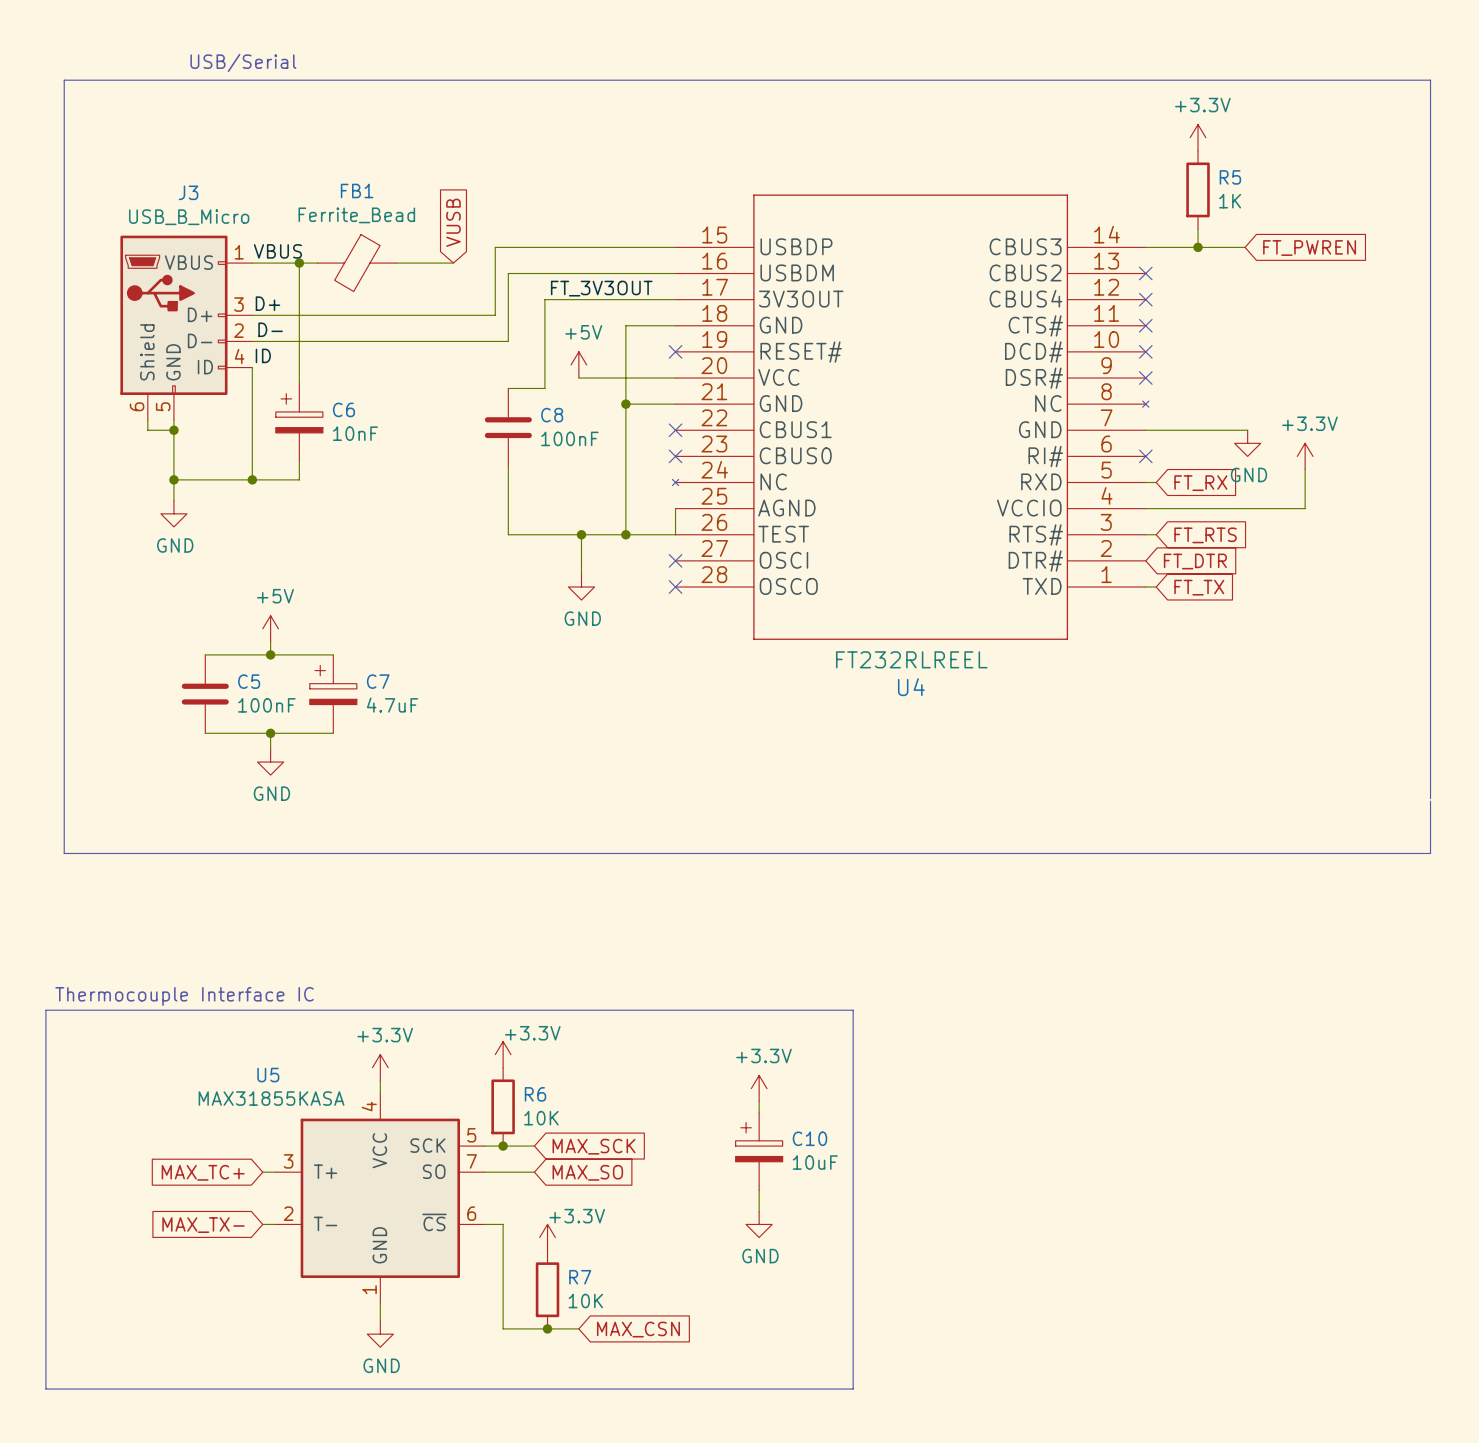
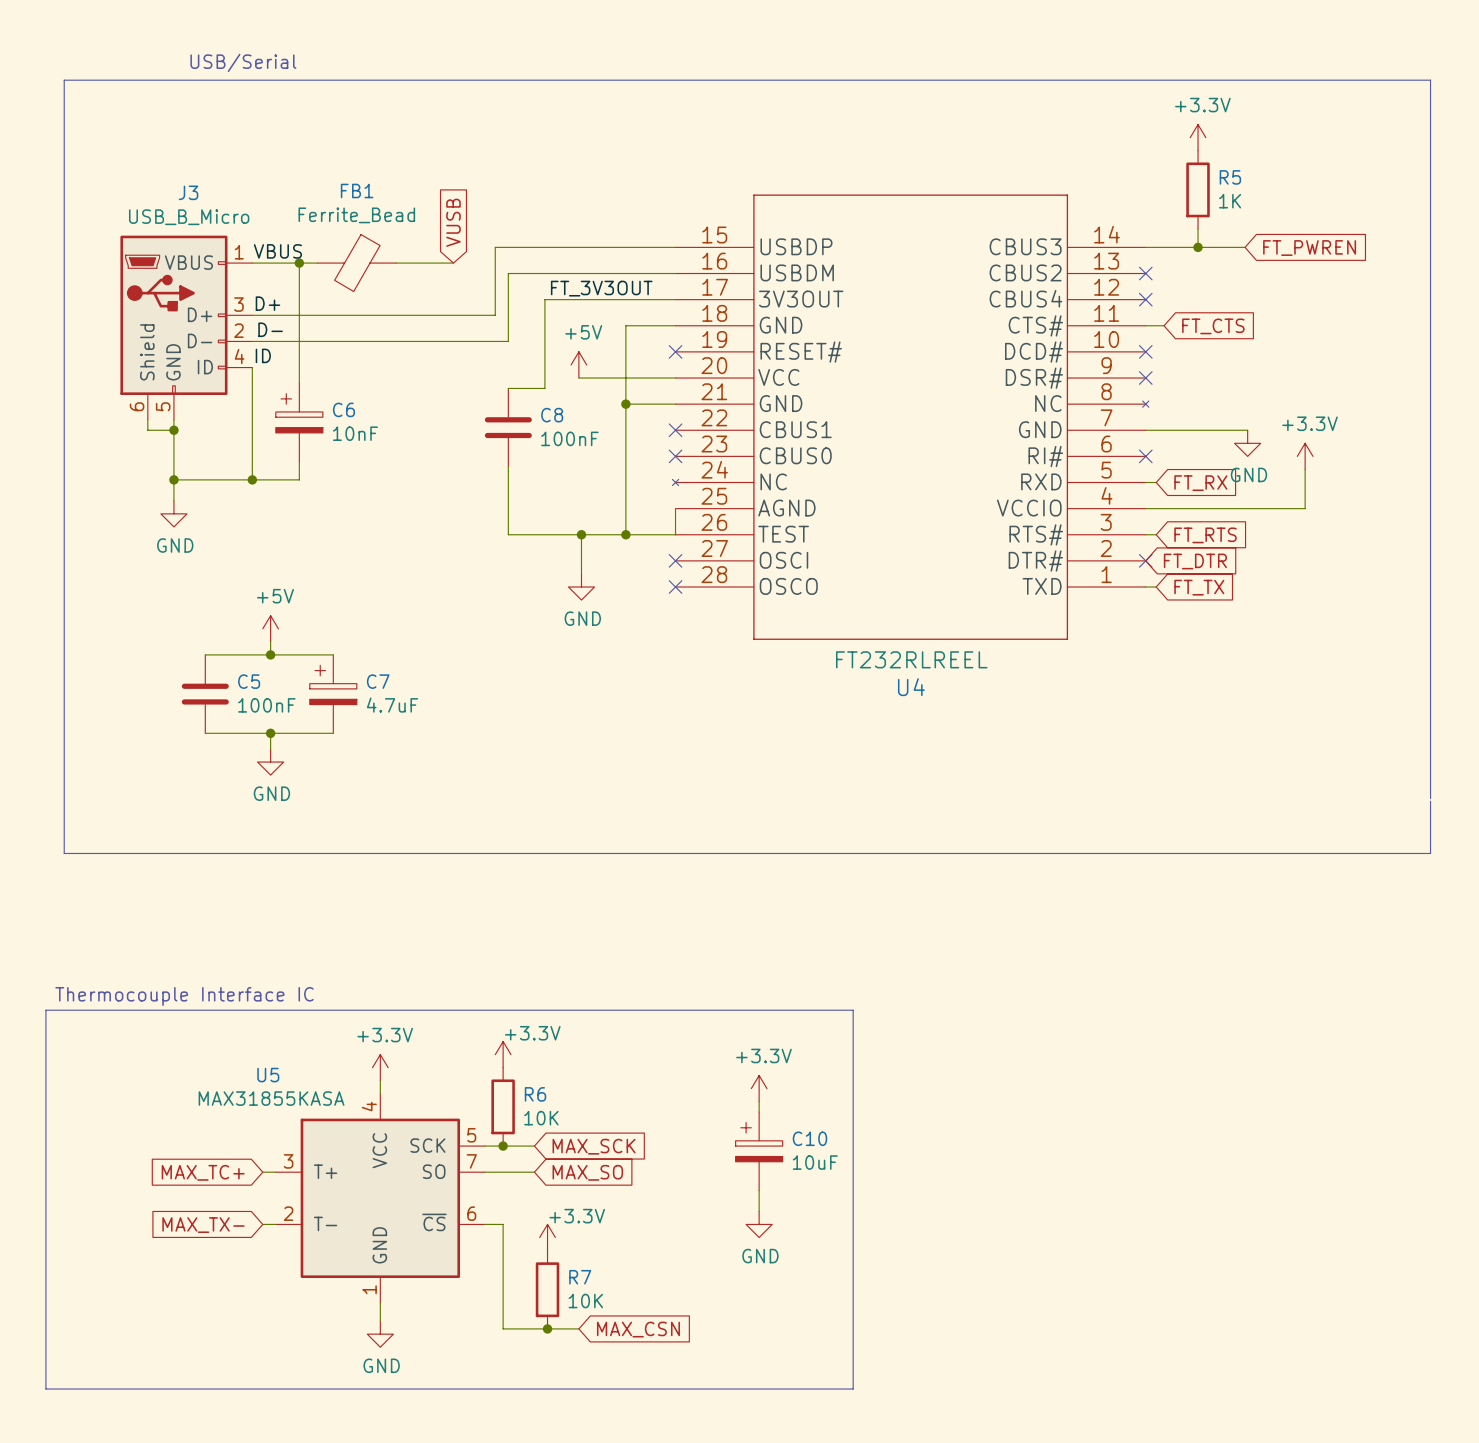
wire: none -> (1145, 325) (1164, 325)
no-connect mark: (1145, 325) -> none
global label: none -> FT_CTS (1213, 326)
no-connect mark: none -> (1145, 560)

